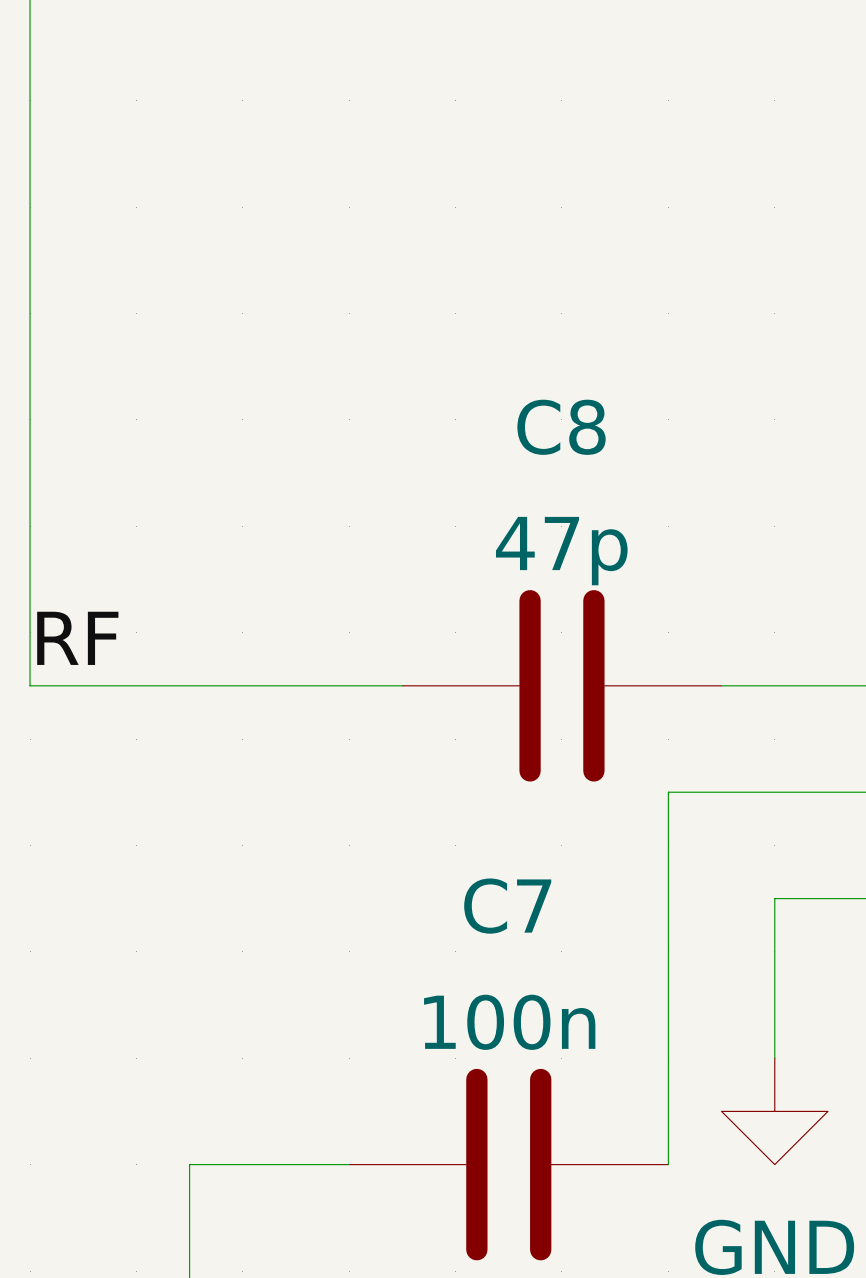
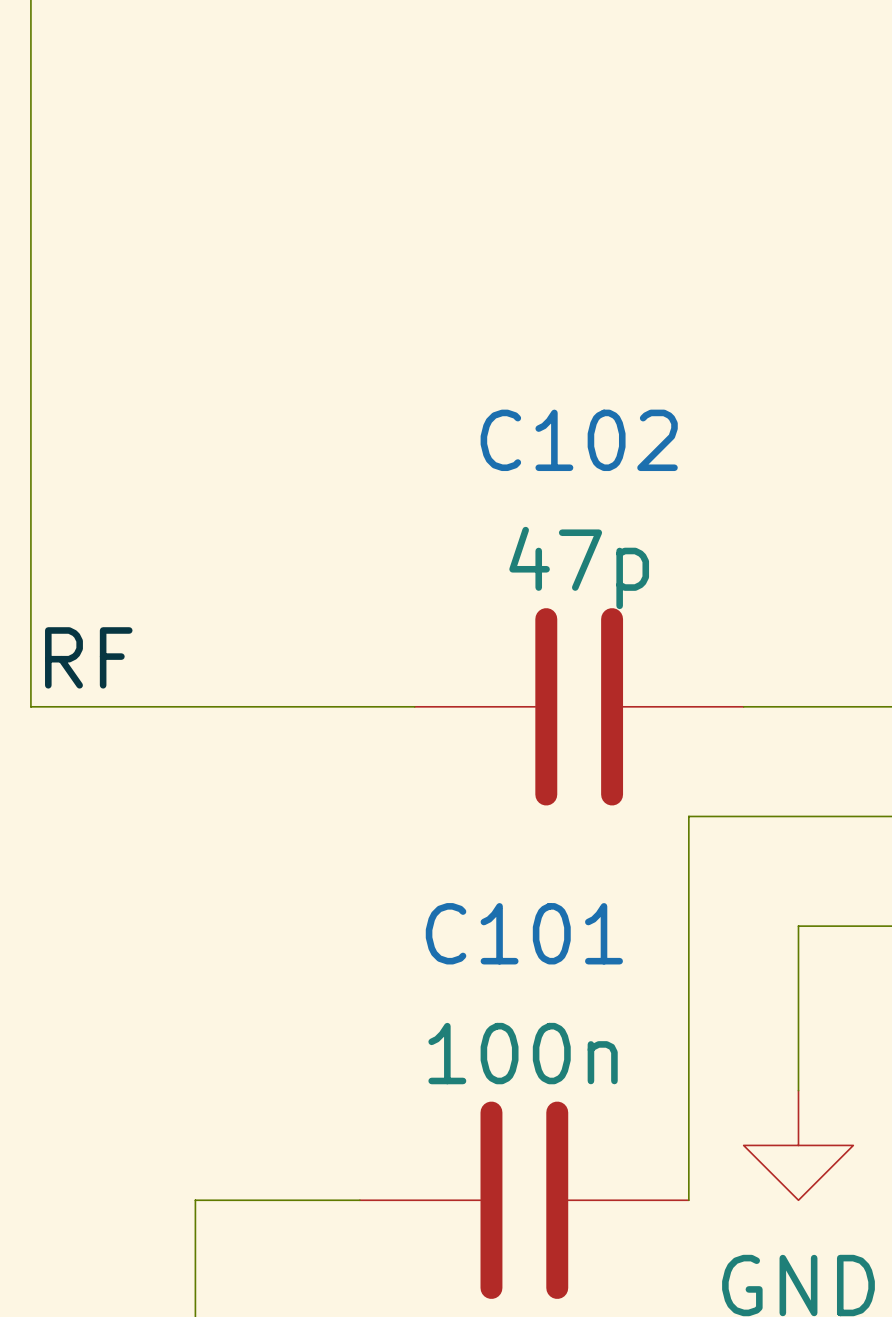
C8 name: C8 (561, 427) -> C102 (579, 440)
C7 name: C7 (507, 906) -> C101 (524, 933)

